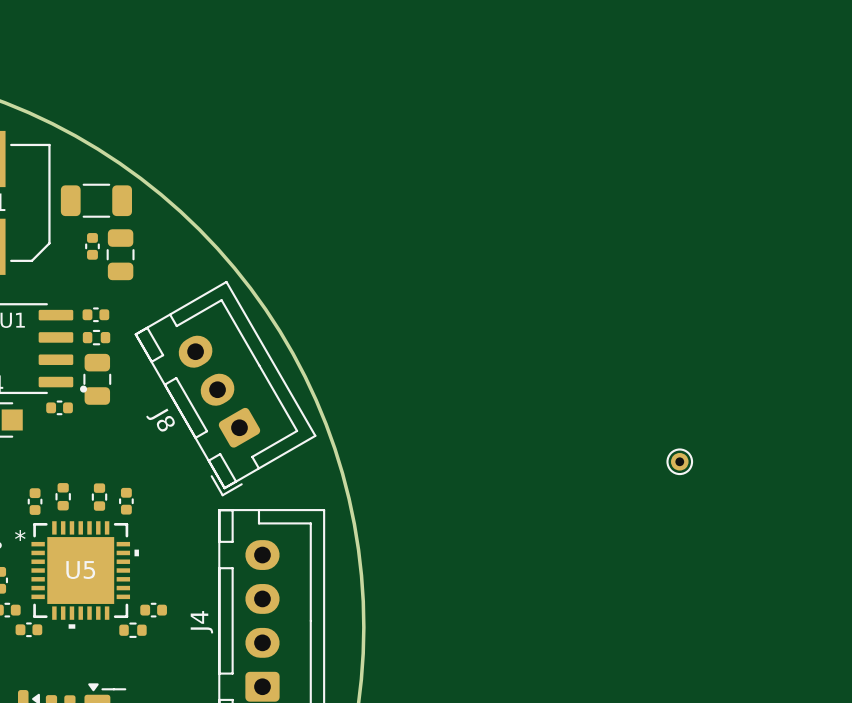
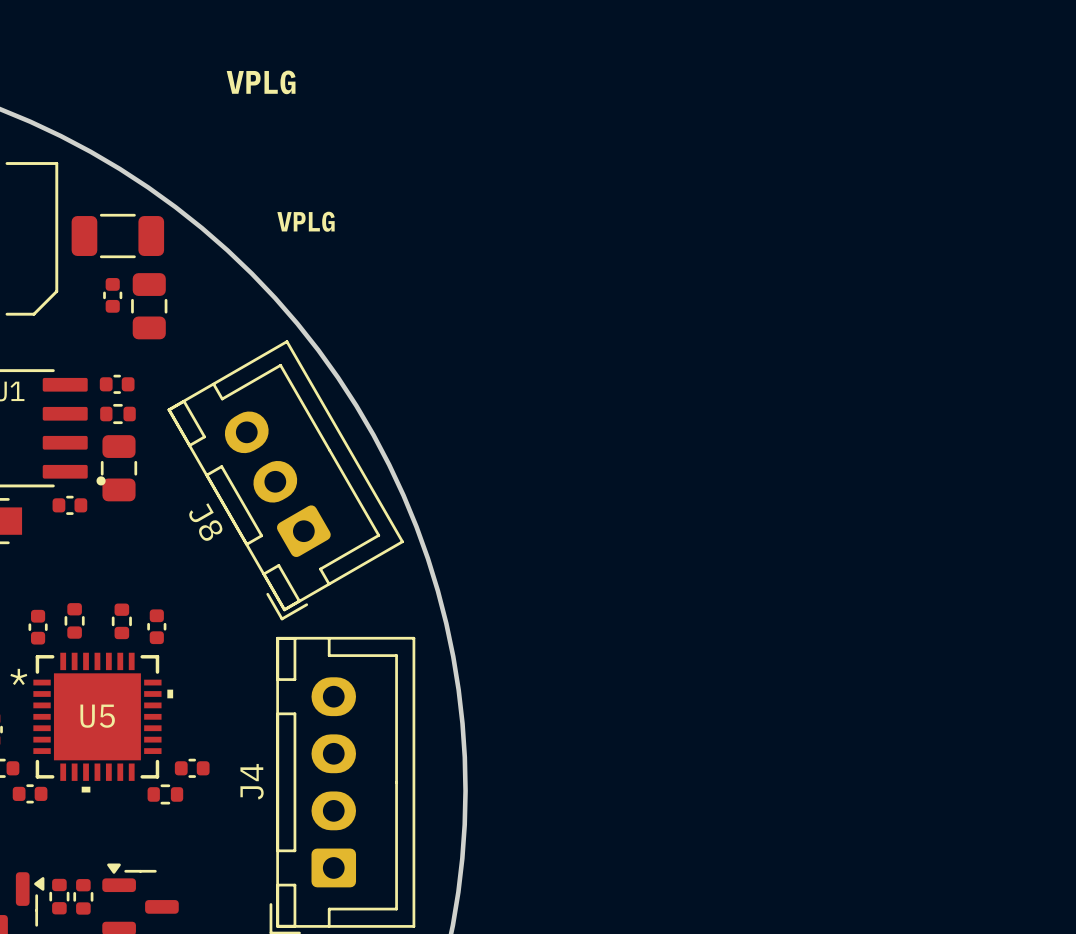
text: none -> VPLG (261, 82)
text: none -> VPLG (306, 221)
part: (679, 461) -> none

